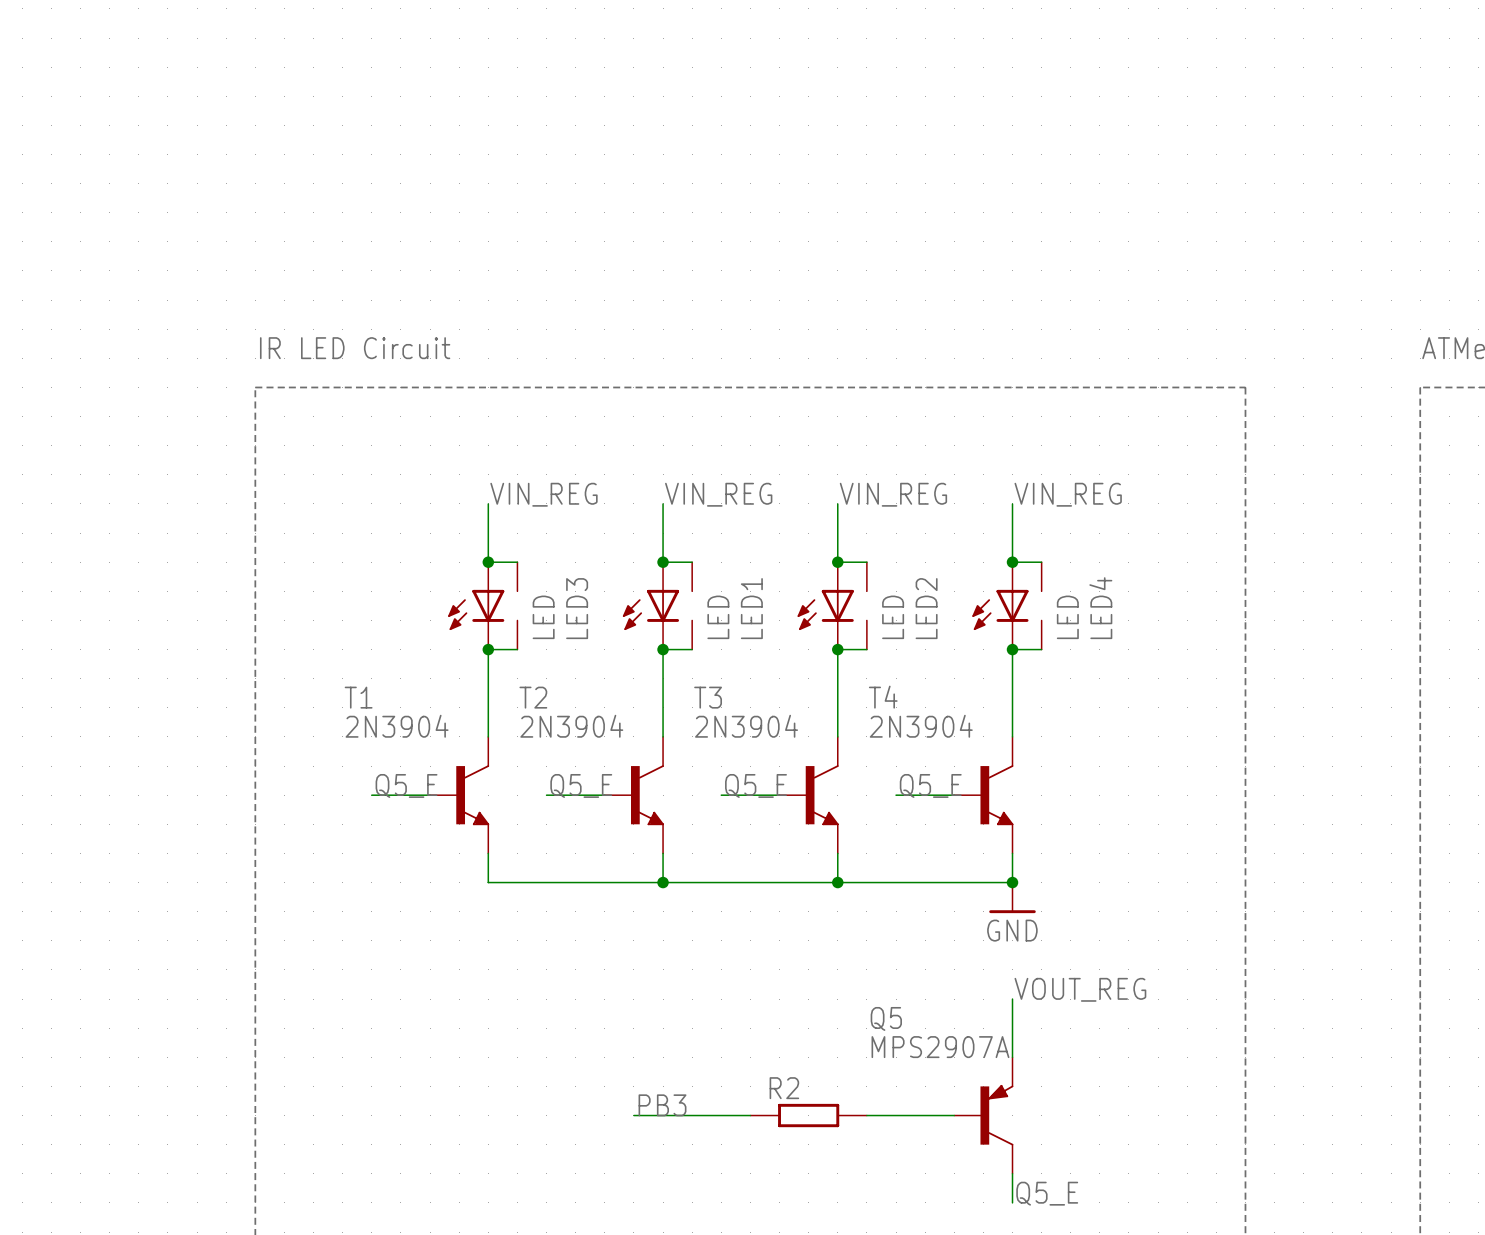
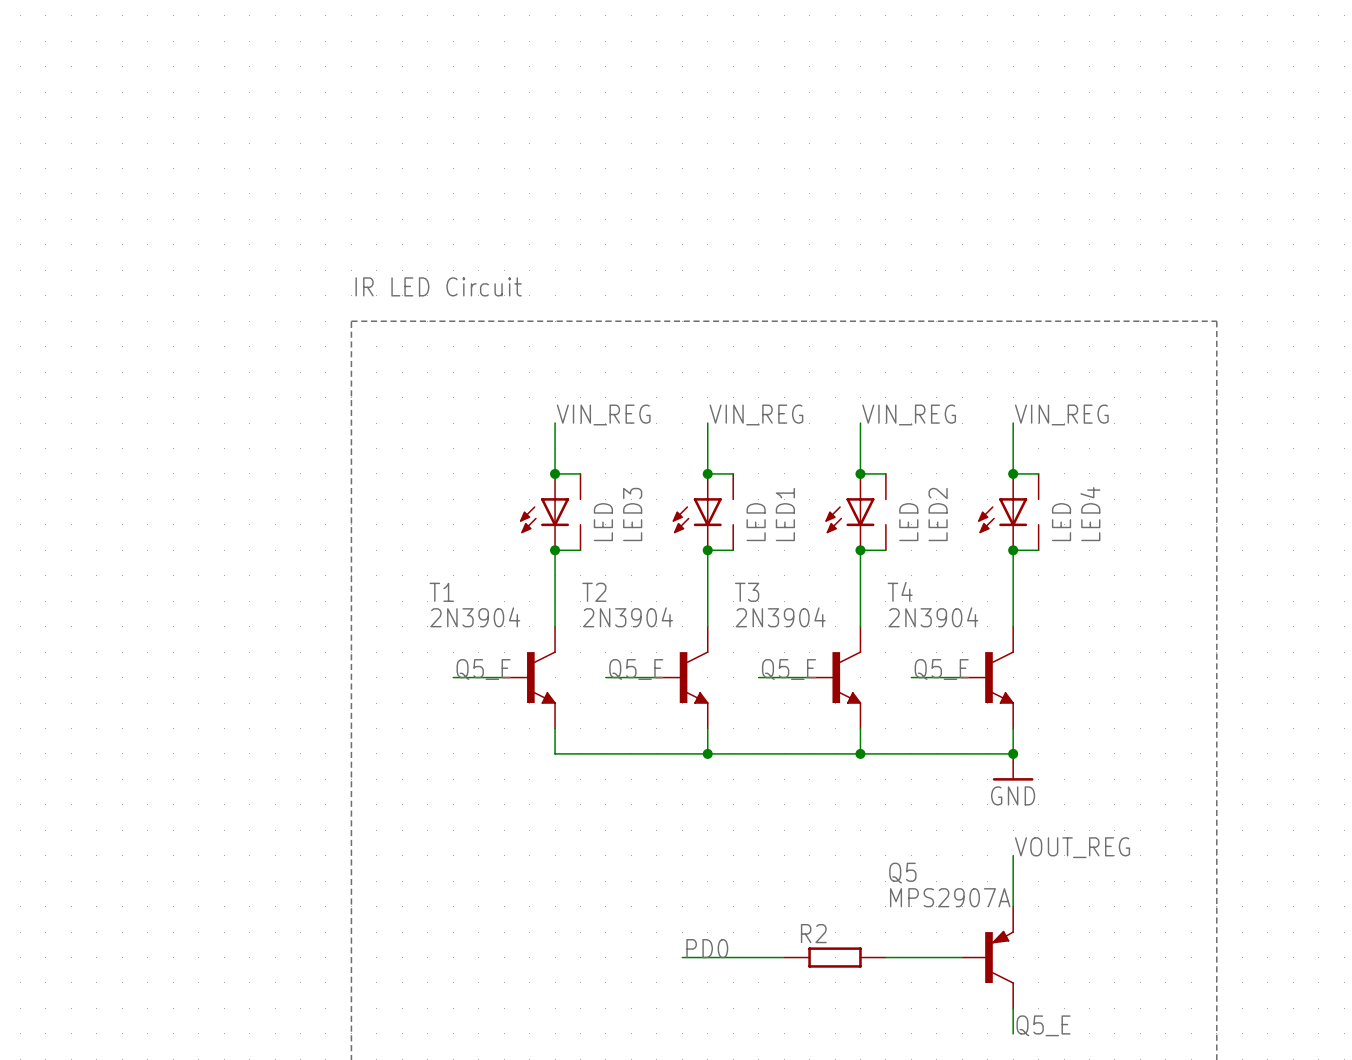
label: PB3 (662, 1105) -> PD0 (707, 948)

